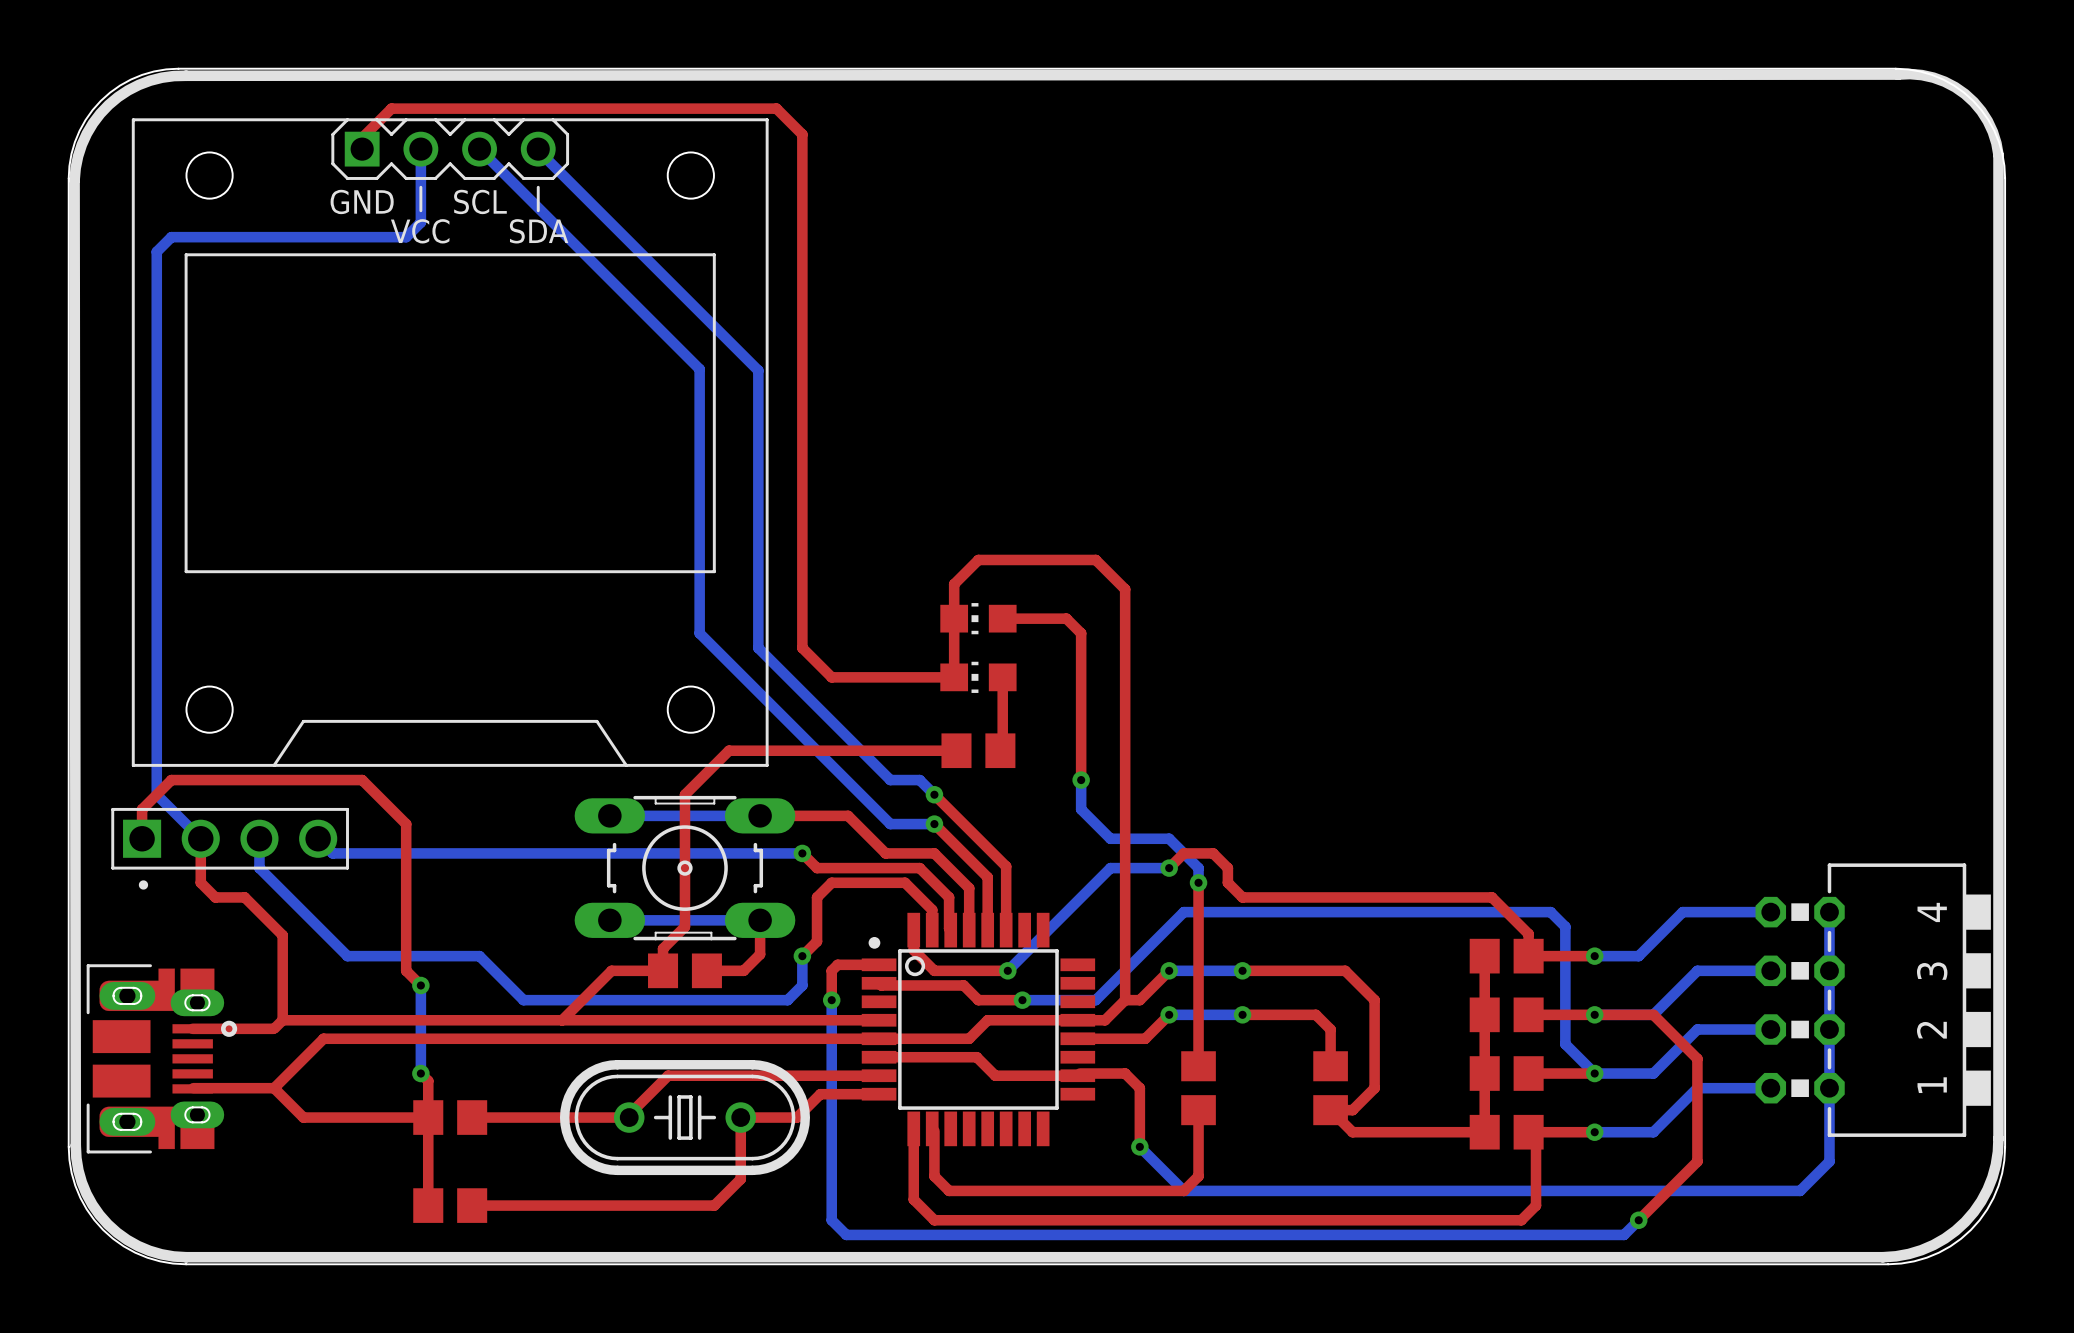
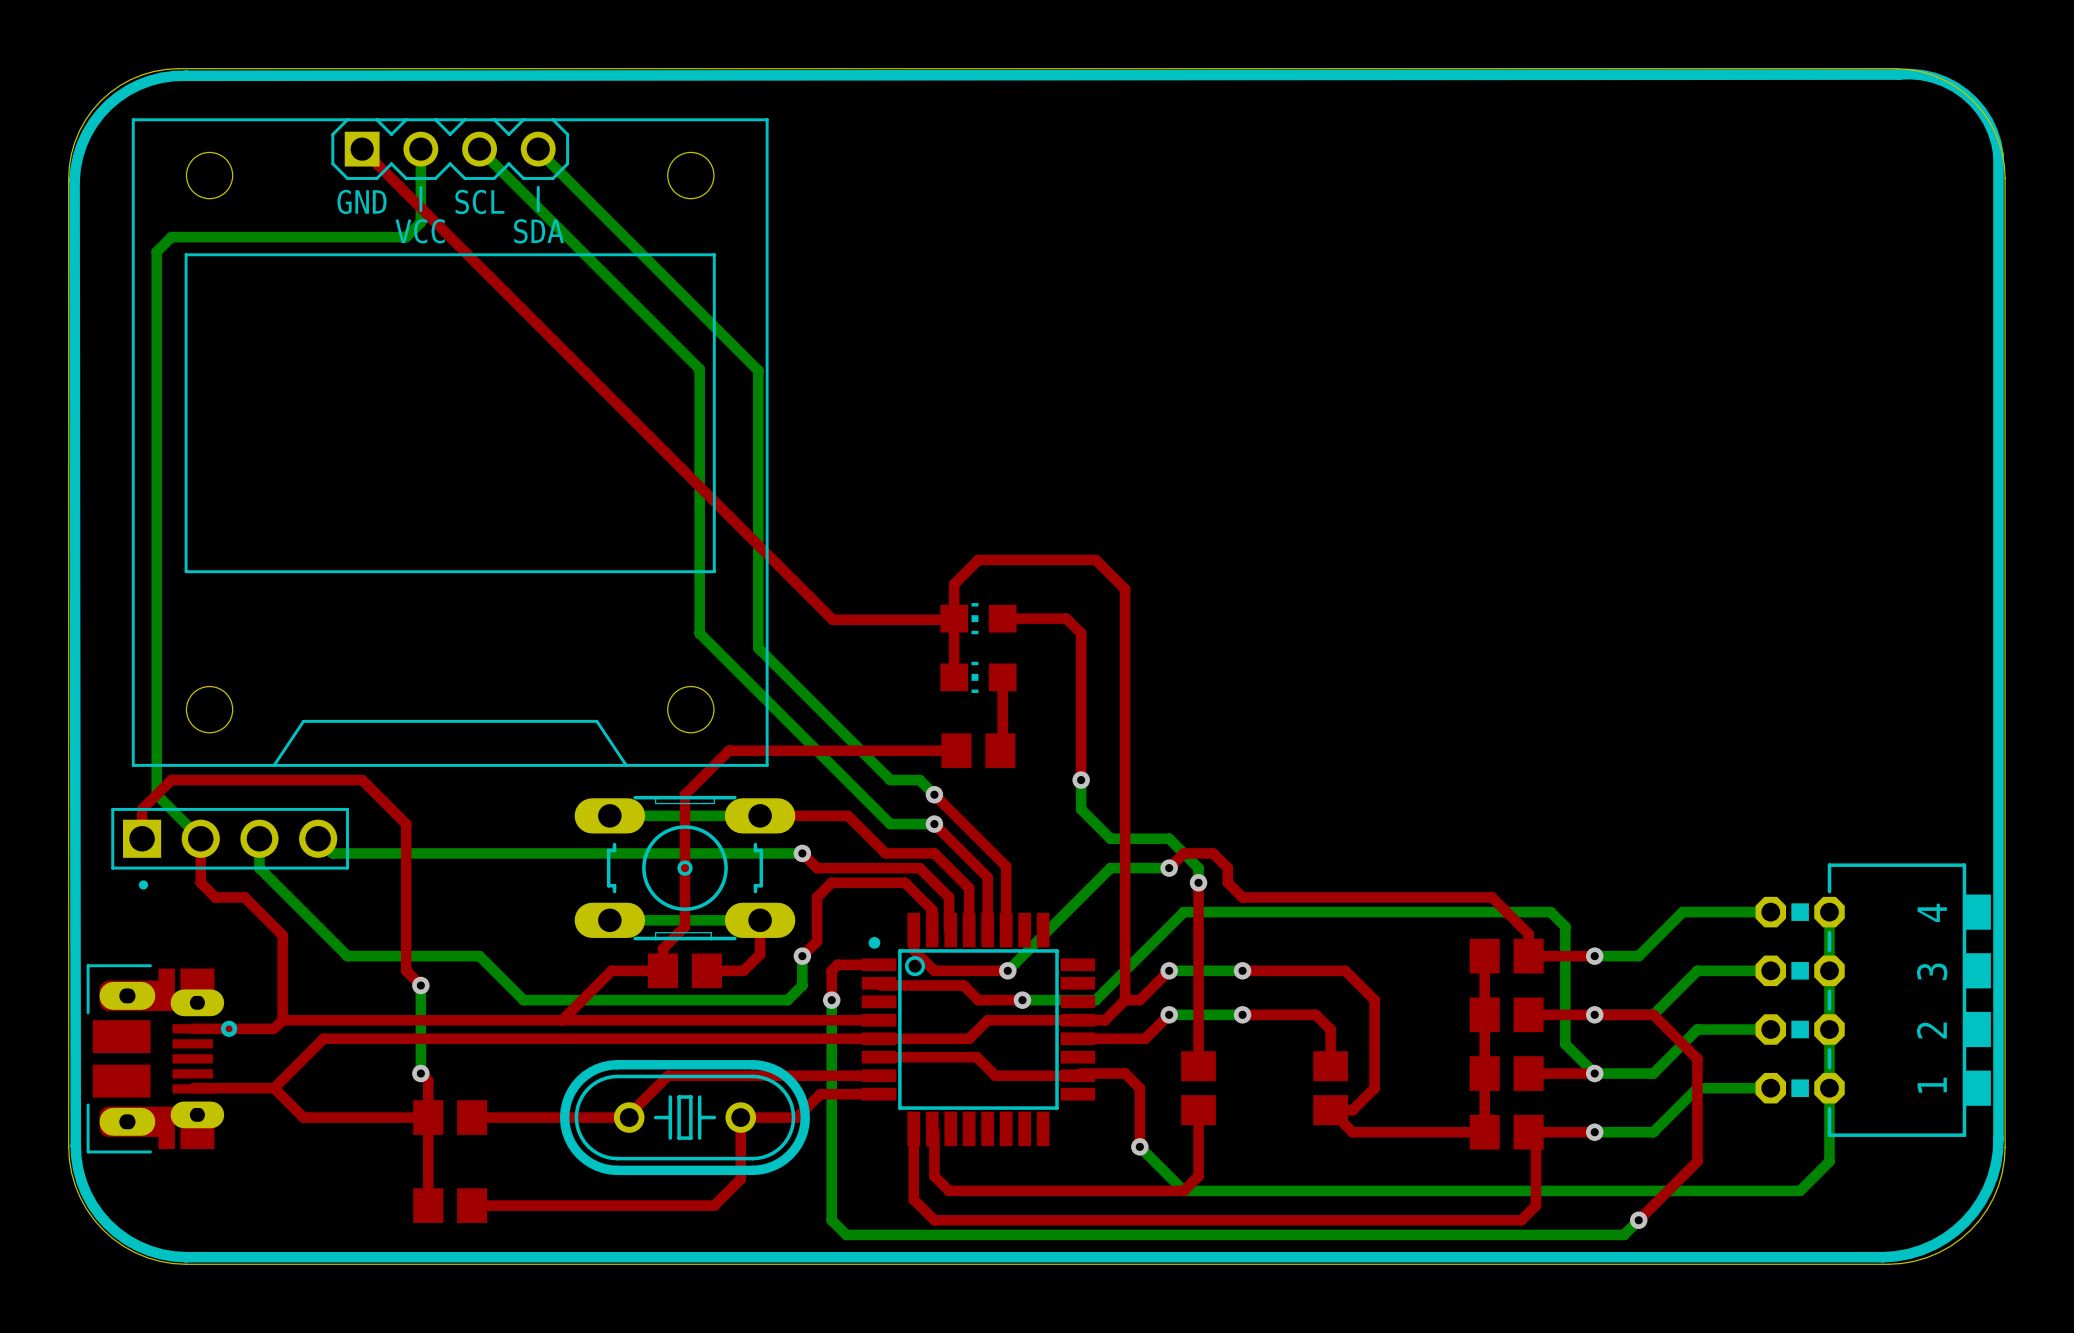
top track: (362, 149) (362, 137) (391, 108) (776, 108) (802, 134) (802, 648) (831, 677) (954, 677) -> (362, 149) (832, 619) (954, 619)

